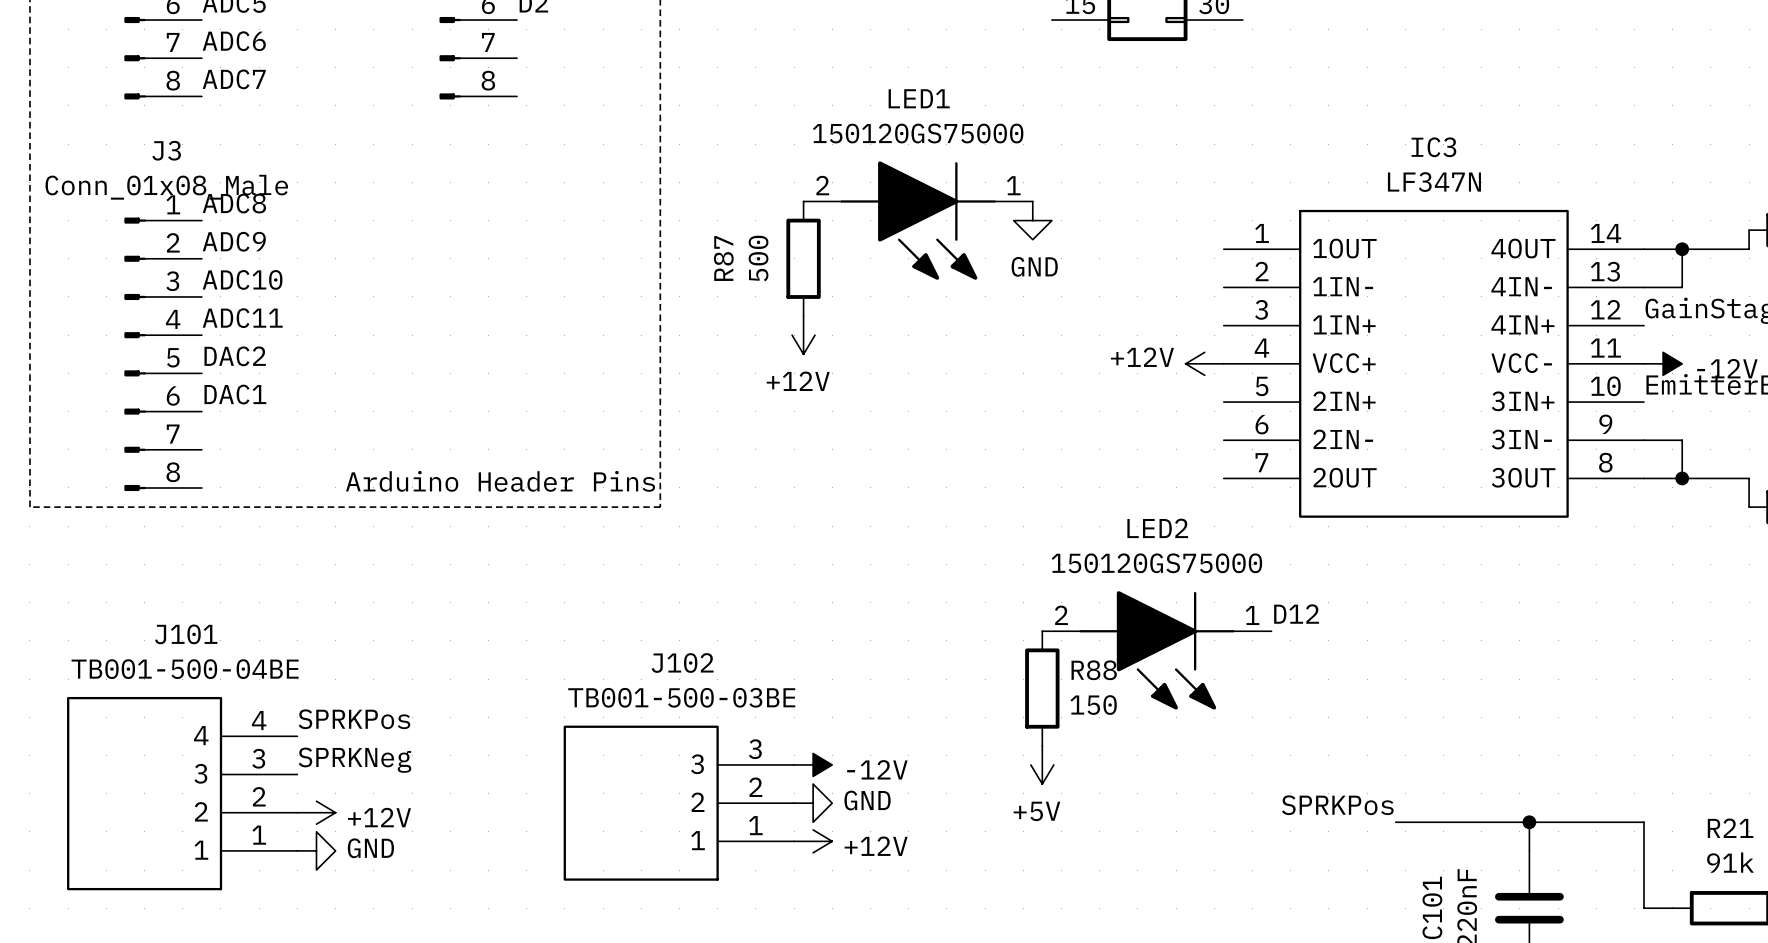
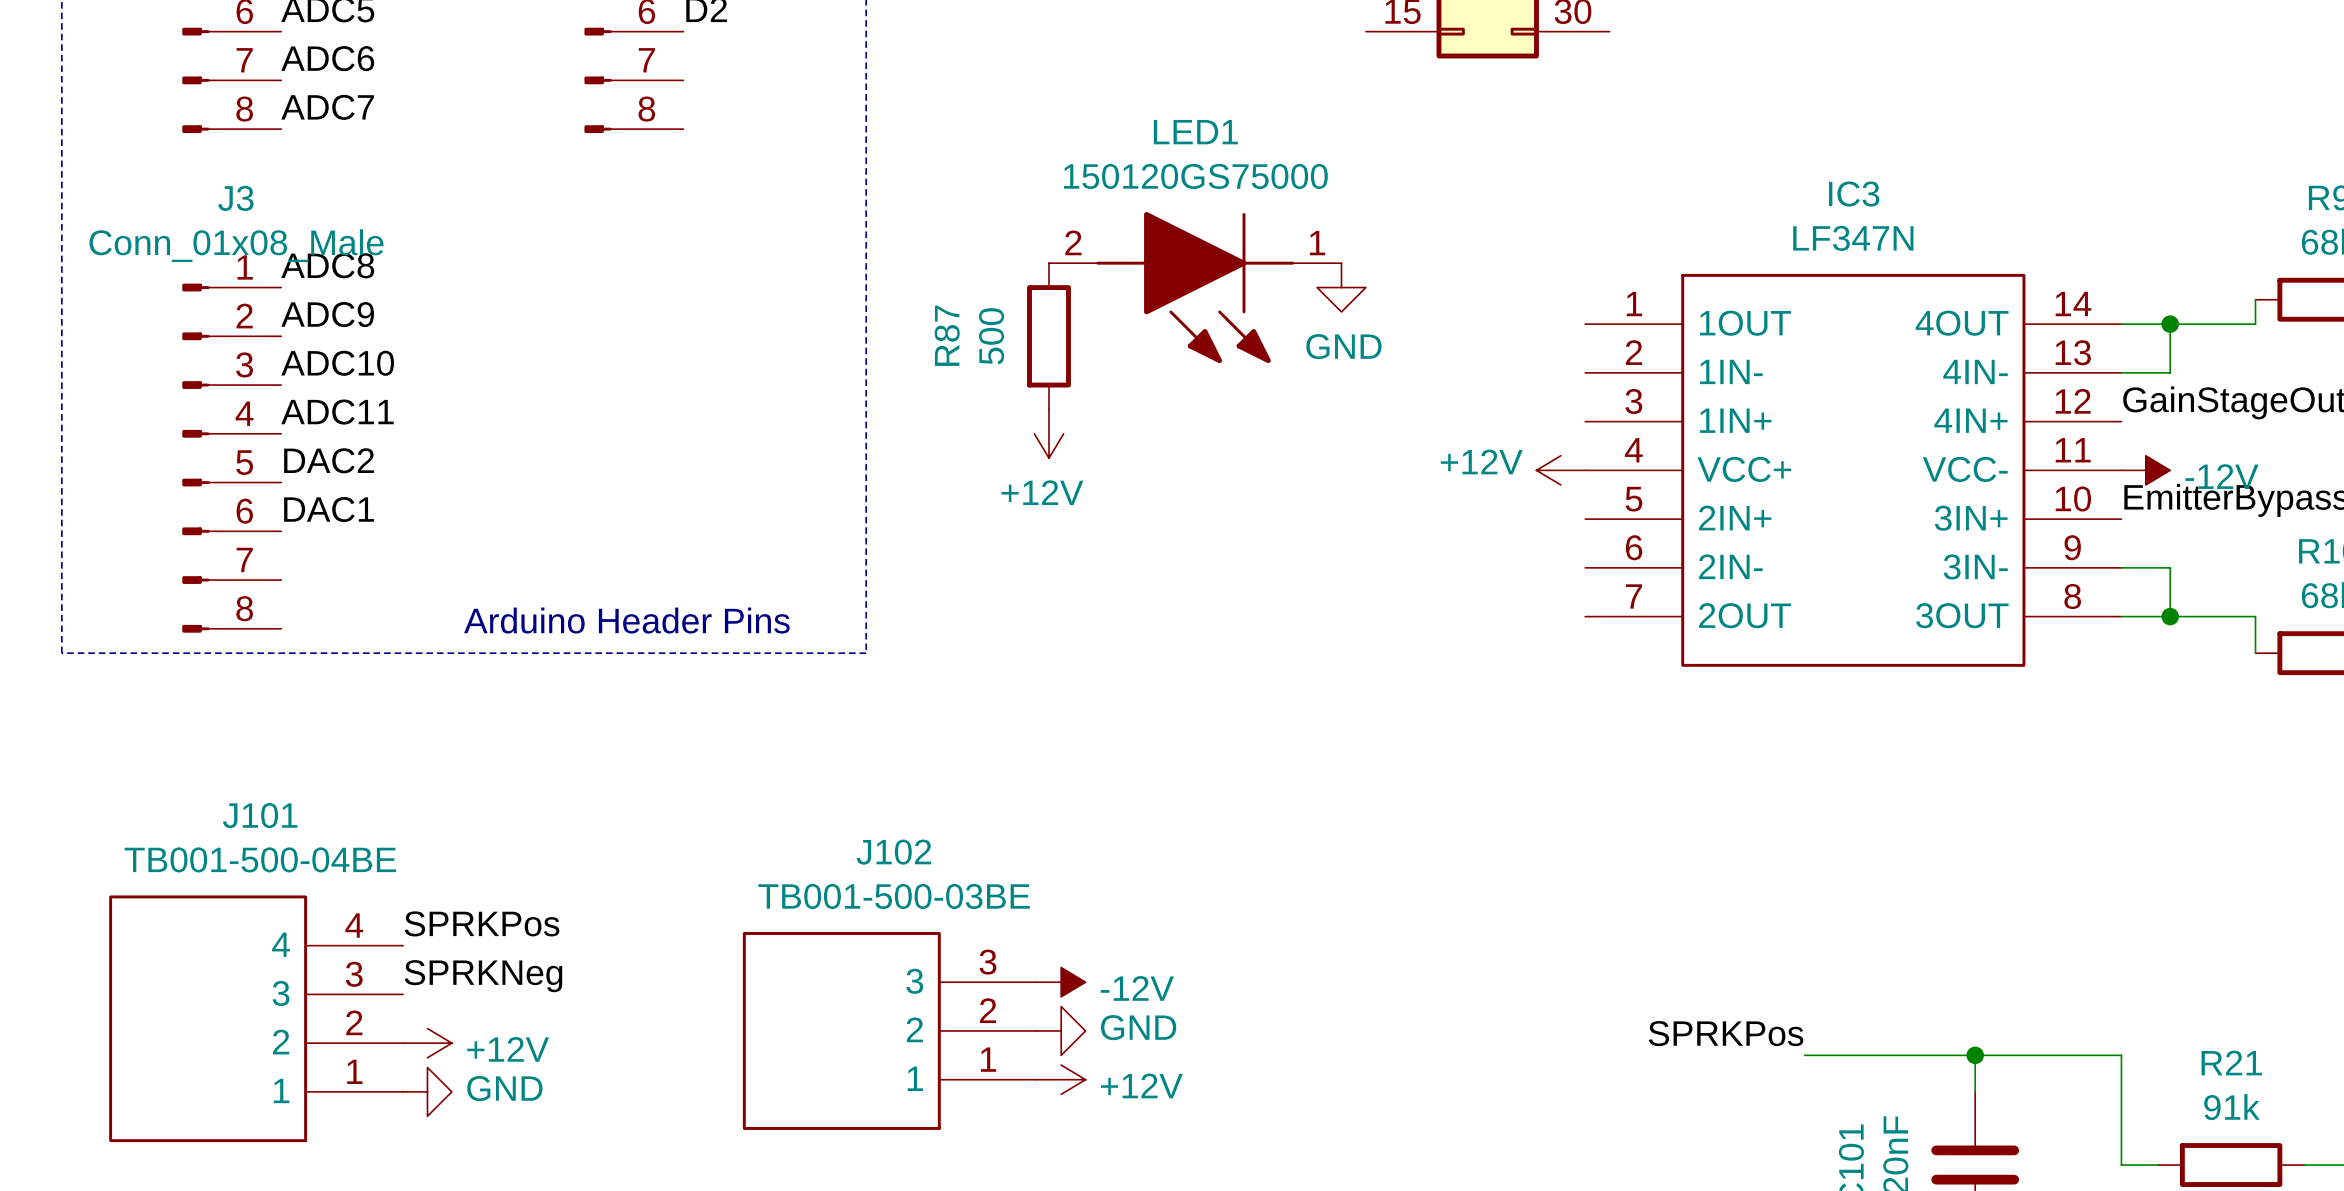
label: D12 (1296, 614) -> none
LED2: 150120GS75000 (1156, 650) -> none
R88: 150 (1042, 688) -> none
power symbol: +5V (1042, 764) -> none

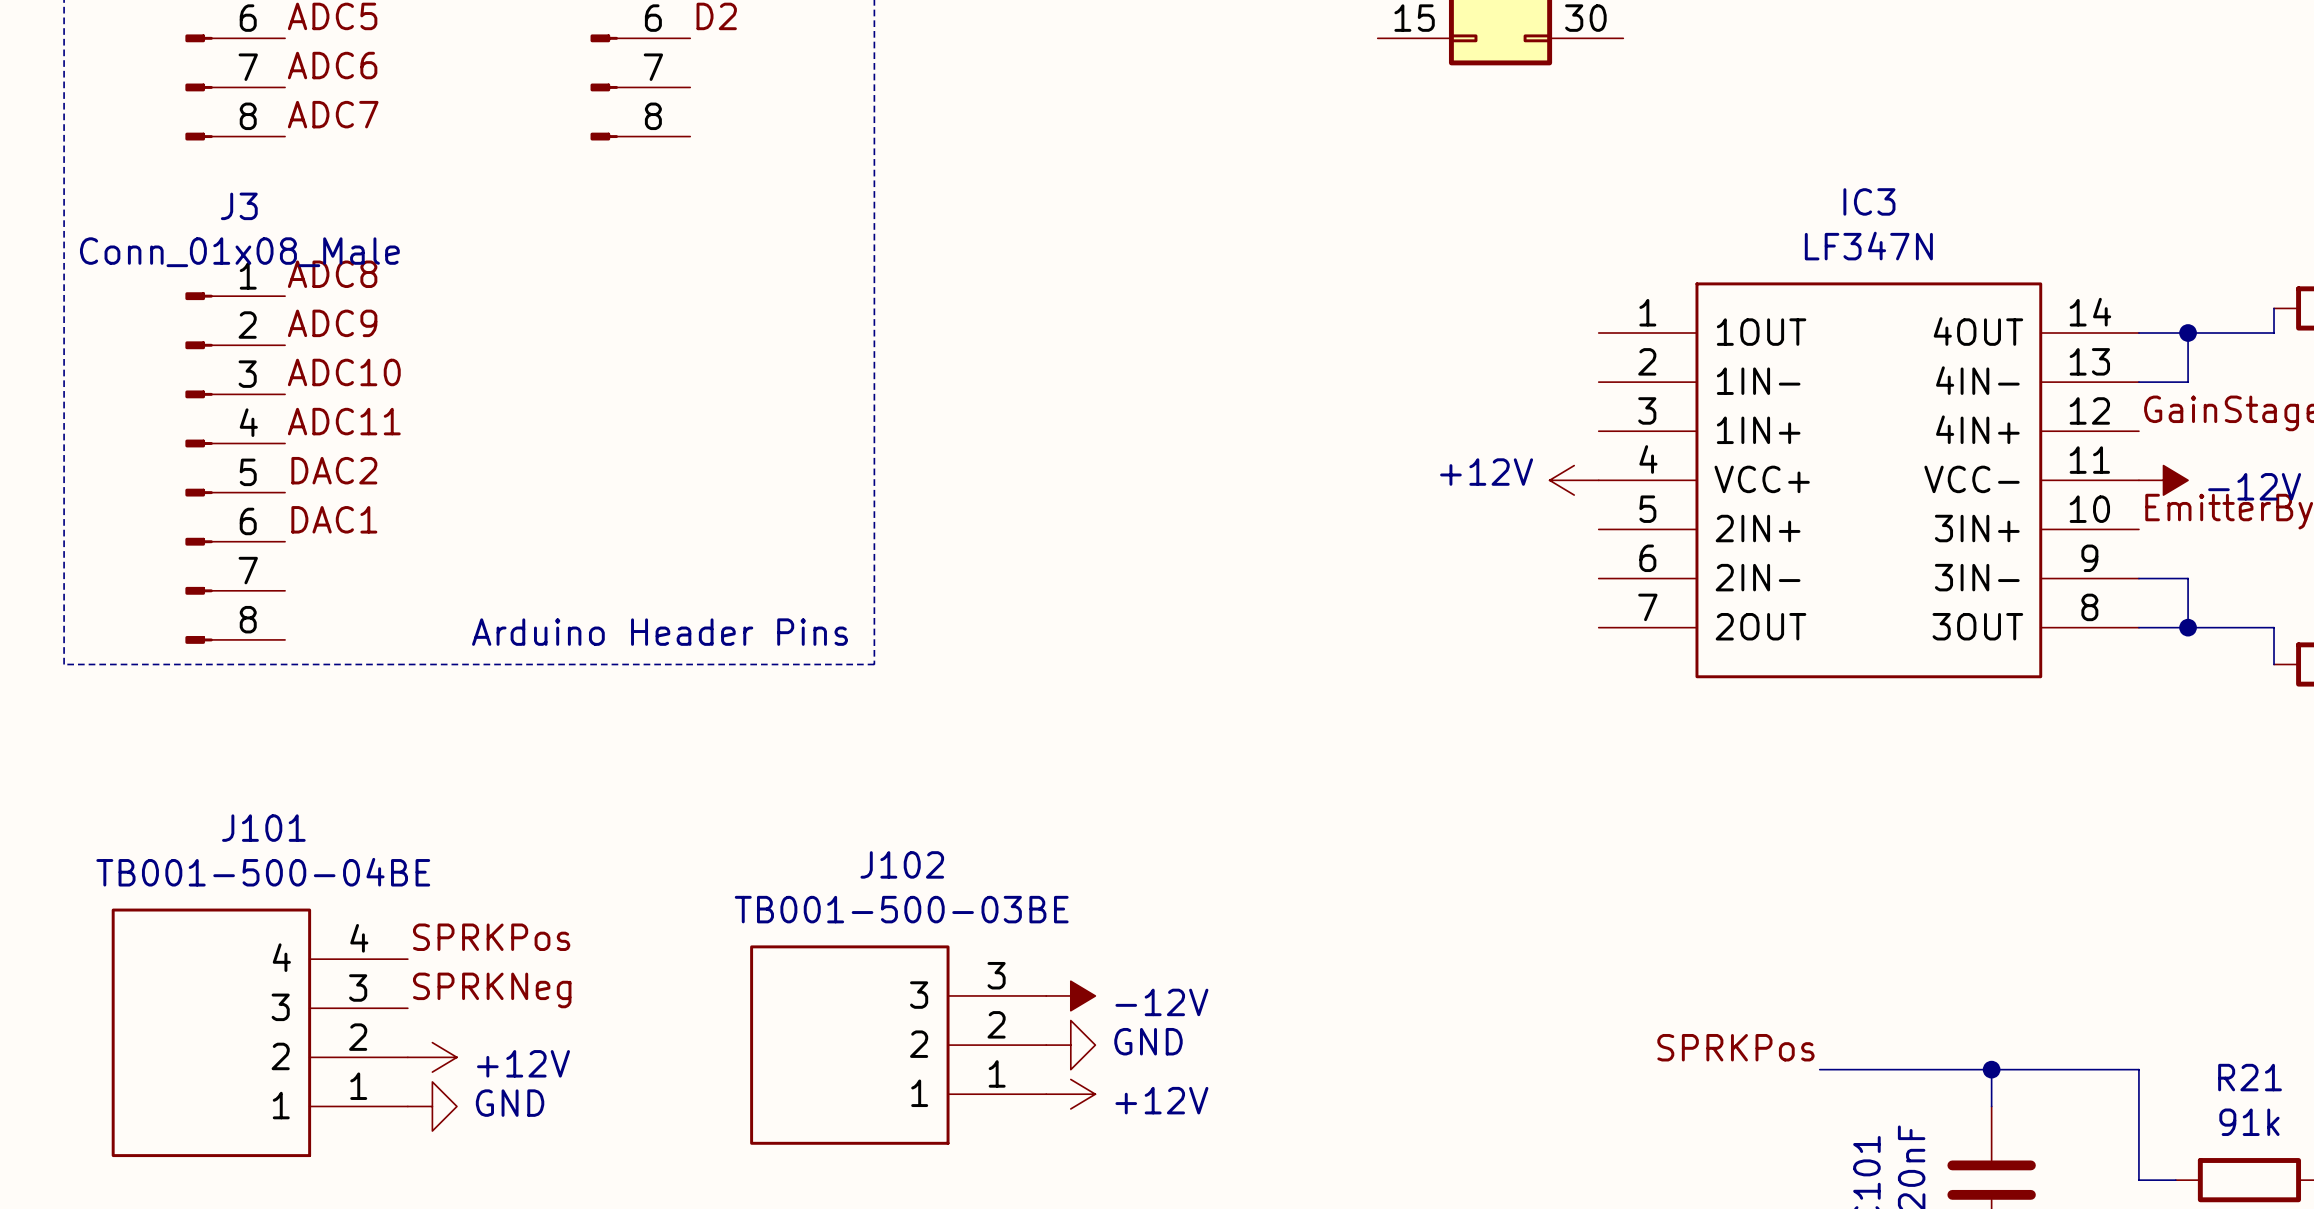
LED1: 150120GS75000 (1195, 287) -> none
power symbol: GND (1341, 287) -> none
R87: 500 (1049, 336) -> none
power symbol: +12V (1049, 433) -> none

